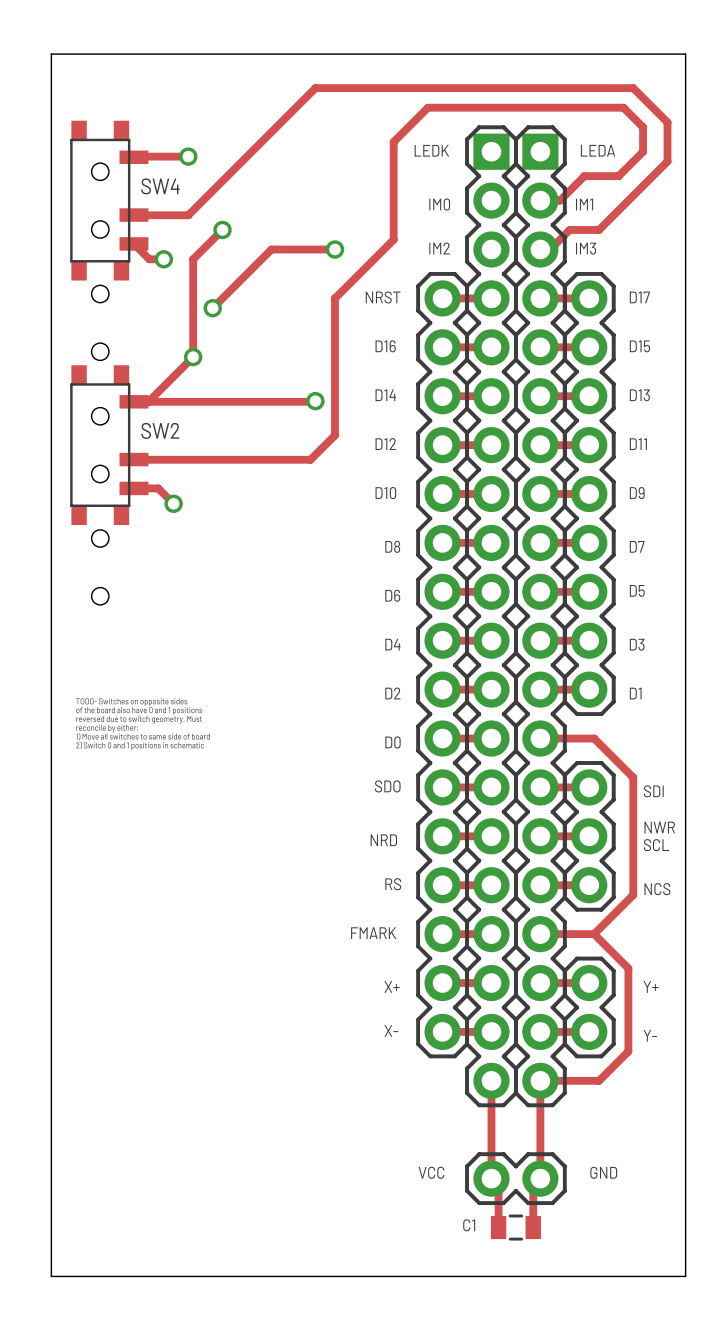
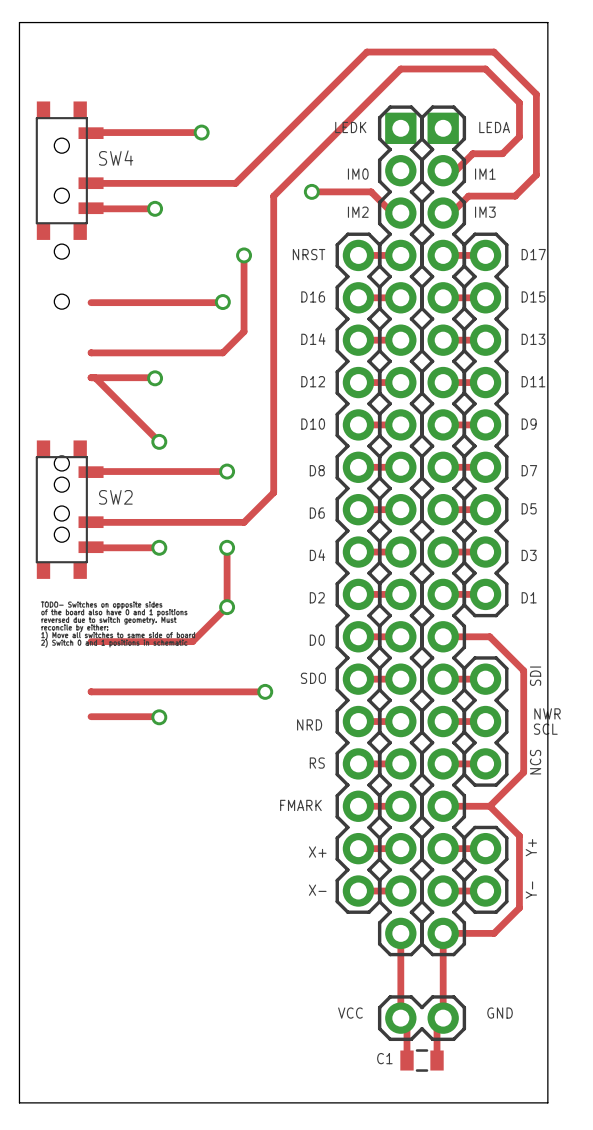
board edge: (51, 54) (685, 54) (685, 1276) (661, 1276) -> (19, 43) (19, 22) (547, 22) (547, 1102)
track: none -> (138, 132) (201, 132)
via: (188, 156) -> none
via: none -> (201, 132)
track: (555, 200) (559, 200) (584, 176) (618, 176) (643, 151) (643, 127) (623, 107) (427, 107) (393, 141) (393, 239) (334, 298) (334, 435) (310, 459) (134, 459) -> (455, 170) (472, 153) (502, 153) (519, 136) (519, 102) (485, 69) (400, 69) (273, 196) (273, 492) (244, 522) (91, 522)
track: (188, 215) (315, 88) (633, 88) (667, 122) (667, 161) (599, 229) -> (138, 183) (235, 183) (366, 52) (494, 52) (536, 94) (536, 174) (515, 196) (494, 196)
track: none -> (311, 191) (371, 191) (392, 213) (400, 213)
via: none -> (311, 191)
track: (222, 229) (193, 259) (193, 357) (148, 401) -> none
via position: (222, 229) -> (155, 208)
track: (134, 244) (149, 259) (163, 259) -> (91, 208) (155, 208)
track: (334, 249) (271, 249) (212, 308) -> none
via: (334, 249) -> none
via: (163, 259) -> none
track: none -> (244, 255) (244, 331) (222, 352) (91, 352)
via: none -> (244, 255)
via: (212, 308) -> none
track: none -> (222, 302) (91, 302)
via: none -> (222, 302)
via: (193, 357) -> none
track: (315, 401) (133, 401) -> none
via: (315, 401) -> none
track: none -> (91, 377) (155, 378)
track: none -> (95, 377) (159, 441)
via: none -> (155, 378)
SW2 position: (109, 445) -> (69, 509)
track: (133, 488) (158, 488) (173, 503) -> none
via: (173, 503) -> none
via: none -> (159, 441)
track: none -> (227, 471) (91, 472)
via: none -> (227, 471)
track: none -> (91, 547) (159, 547)
via: none -> (159, 547)
track: none -> (227, 547) (227, 607) (192, 641) (91, 641)
via: none -> (227, 547)
via: none -> (227, 607)
text rotation: 0° (653, 791) -> 90° counterclockwise (535, 676)
track: none -> (91, 691) (265, 691)
via: none -> (265, 691)
track: none -> (91, 716) (159, 717)
via: none -> (159, 717)
text rotation: 0° (657, 889) -> 90° counterclockwise (535, 762)
text rotation: 0° (651, 986) -> 90° counterclockwise (531, 847)
text rotation: 0° (650, 1035) -> 90° counterclockwise (531, 890)

